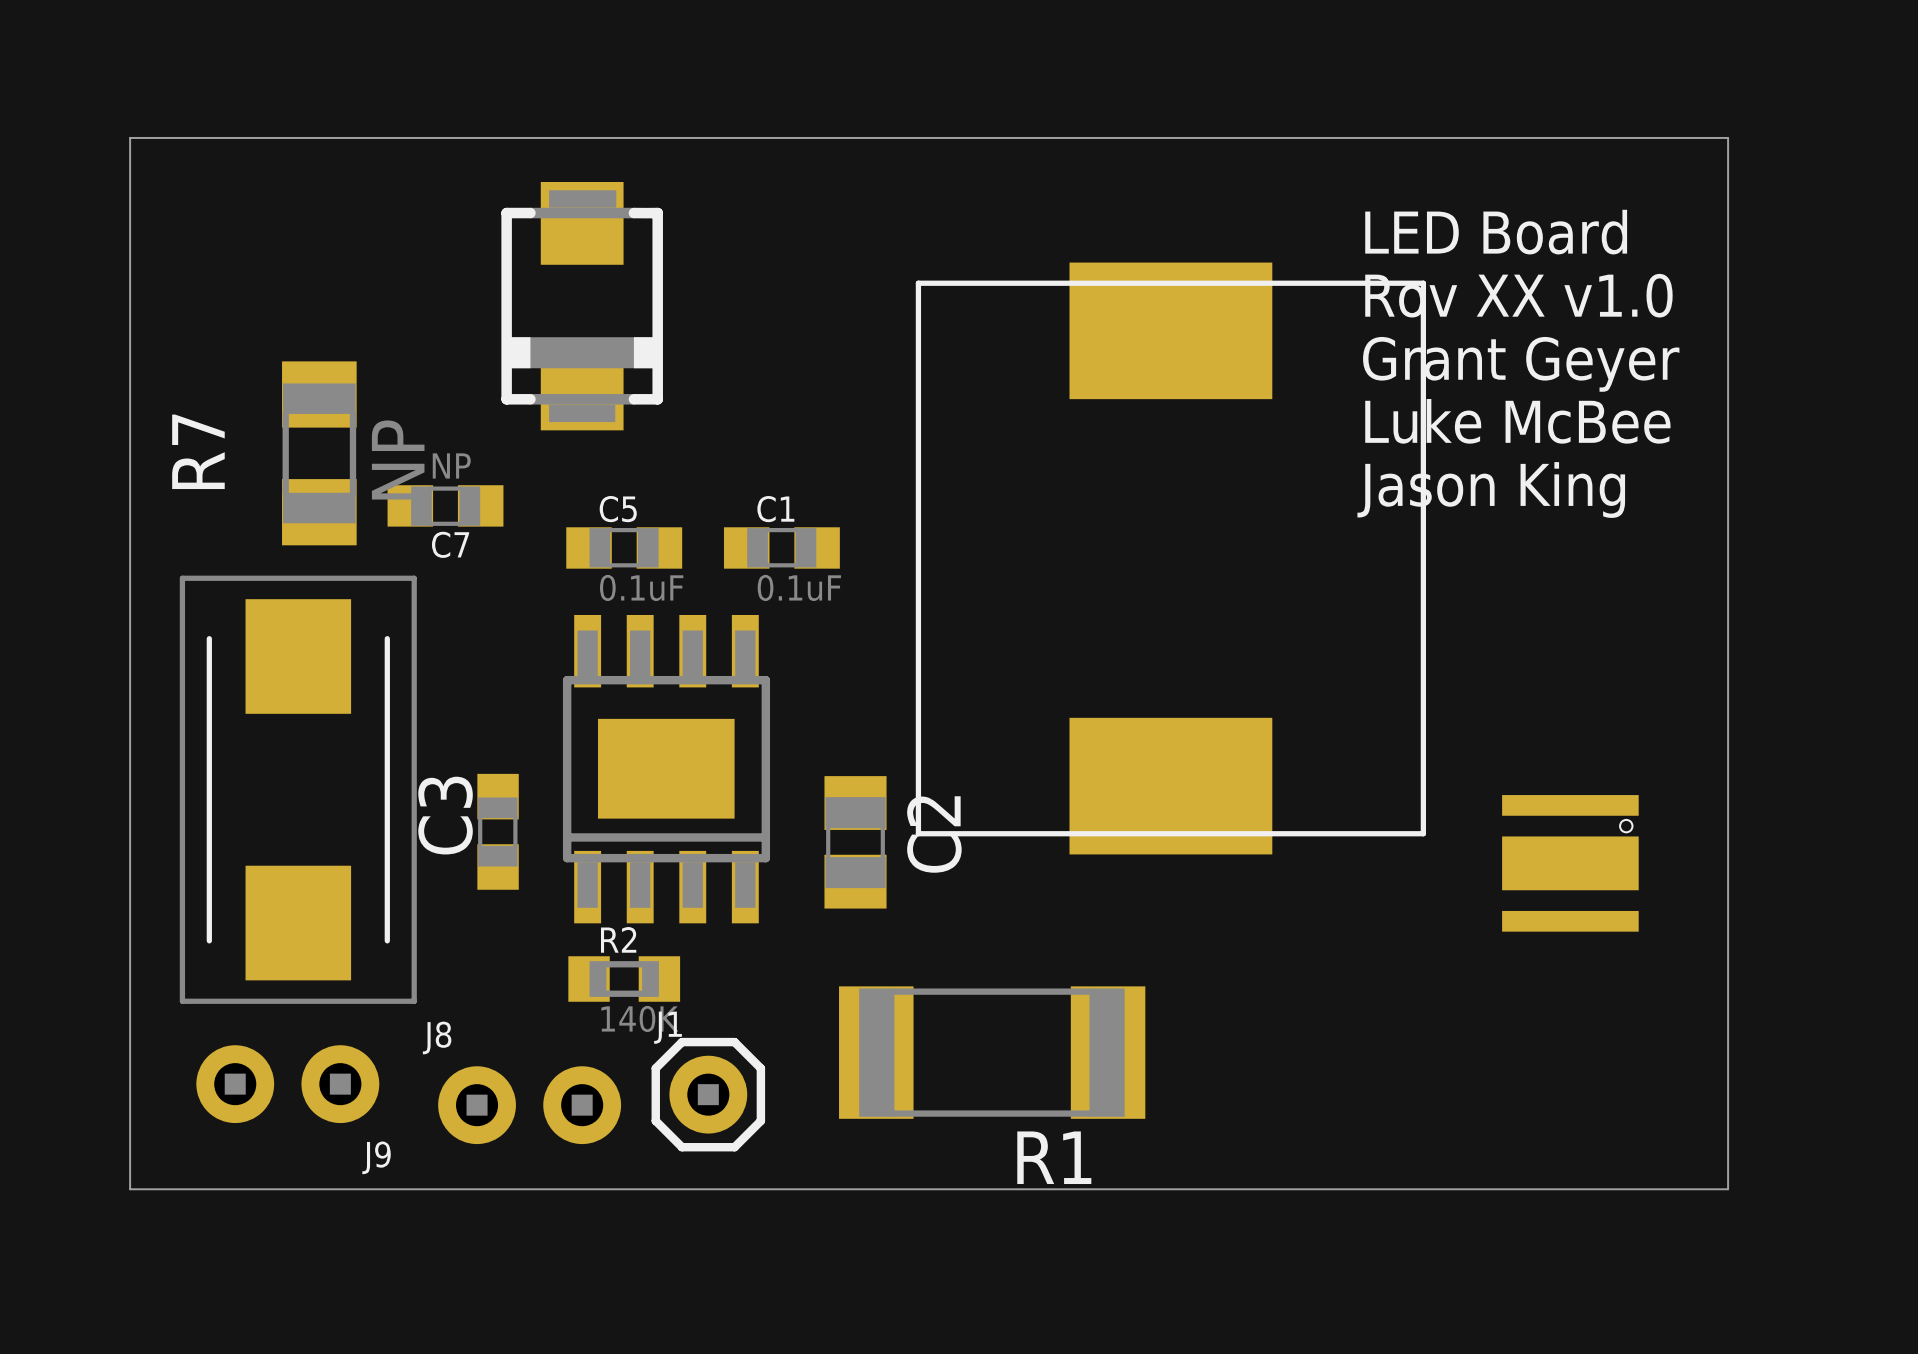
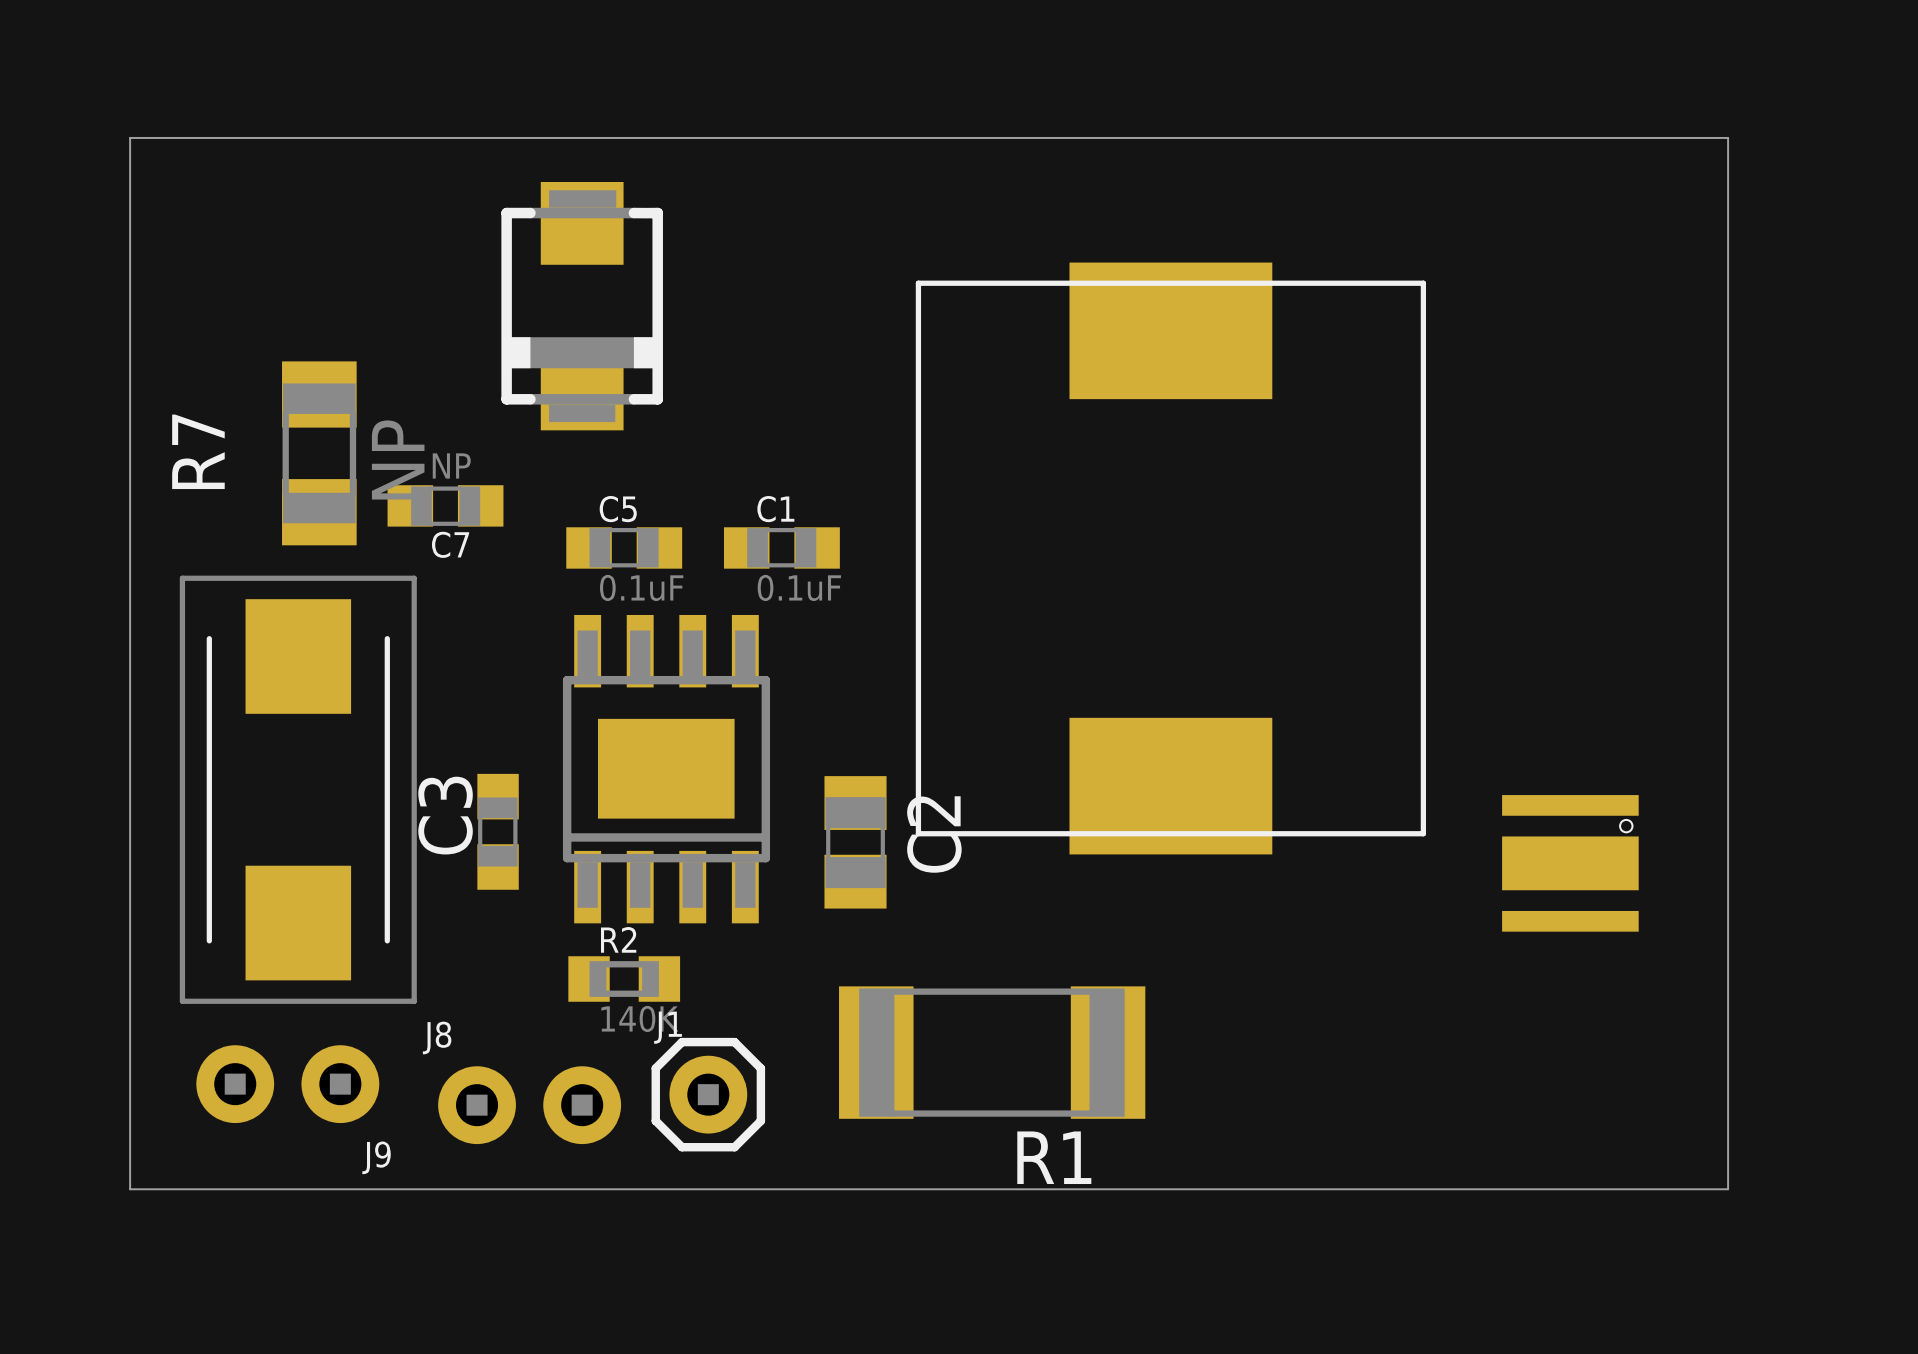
text: LED Board (1496, 232) -> none
text: Rov XX v1.0 (1518, 295) -> none
text: Grant Geyer (1521, 364) -> none
text: Luke McBee (1517, 421) -> none
text: Jason King (1491, 490) -> none

